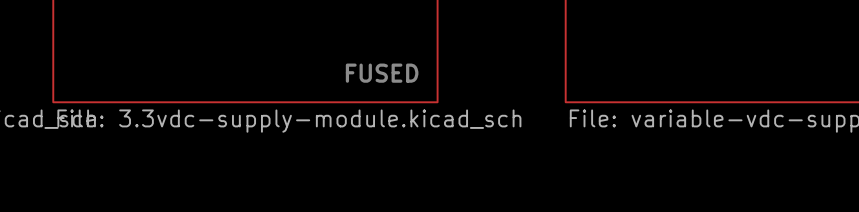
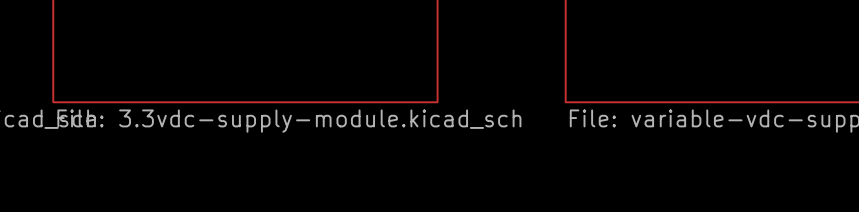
text: FUSED (382, 73) -> none

